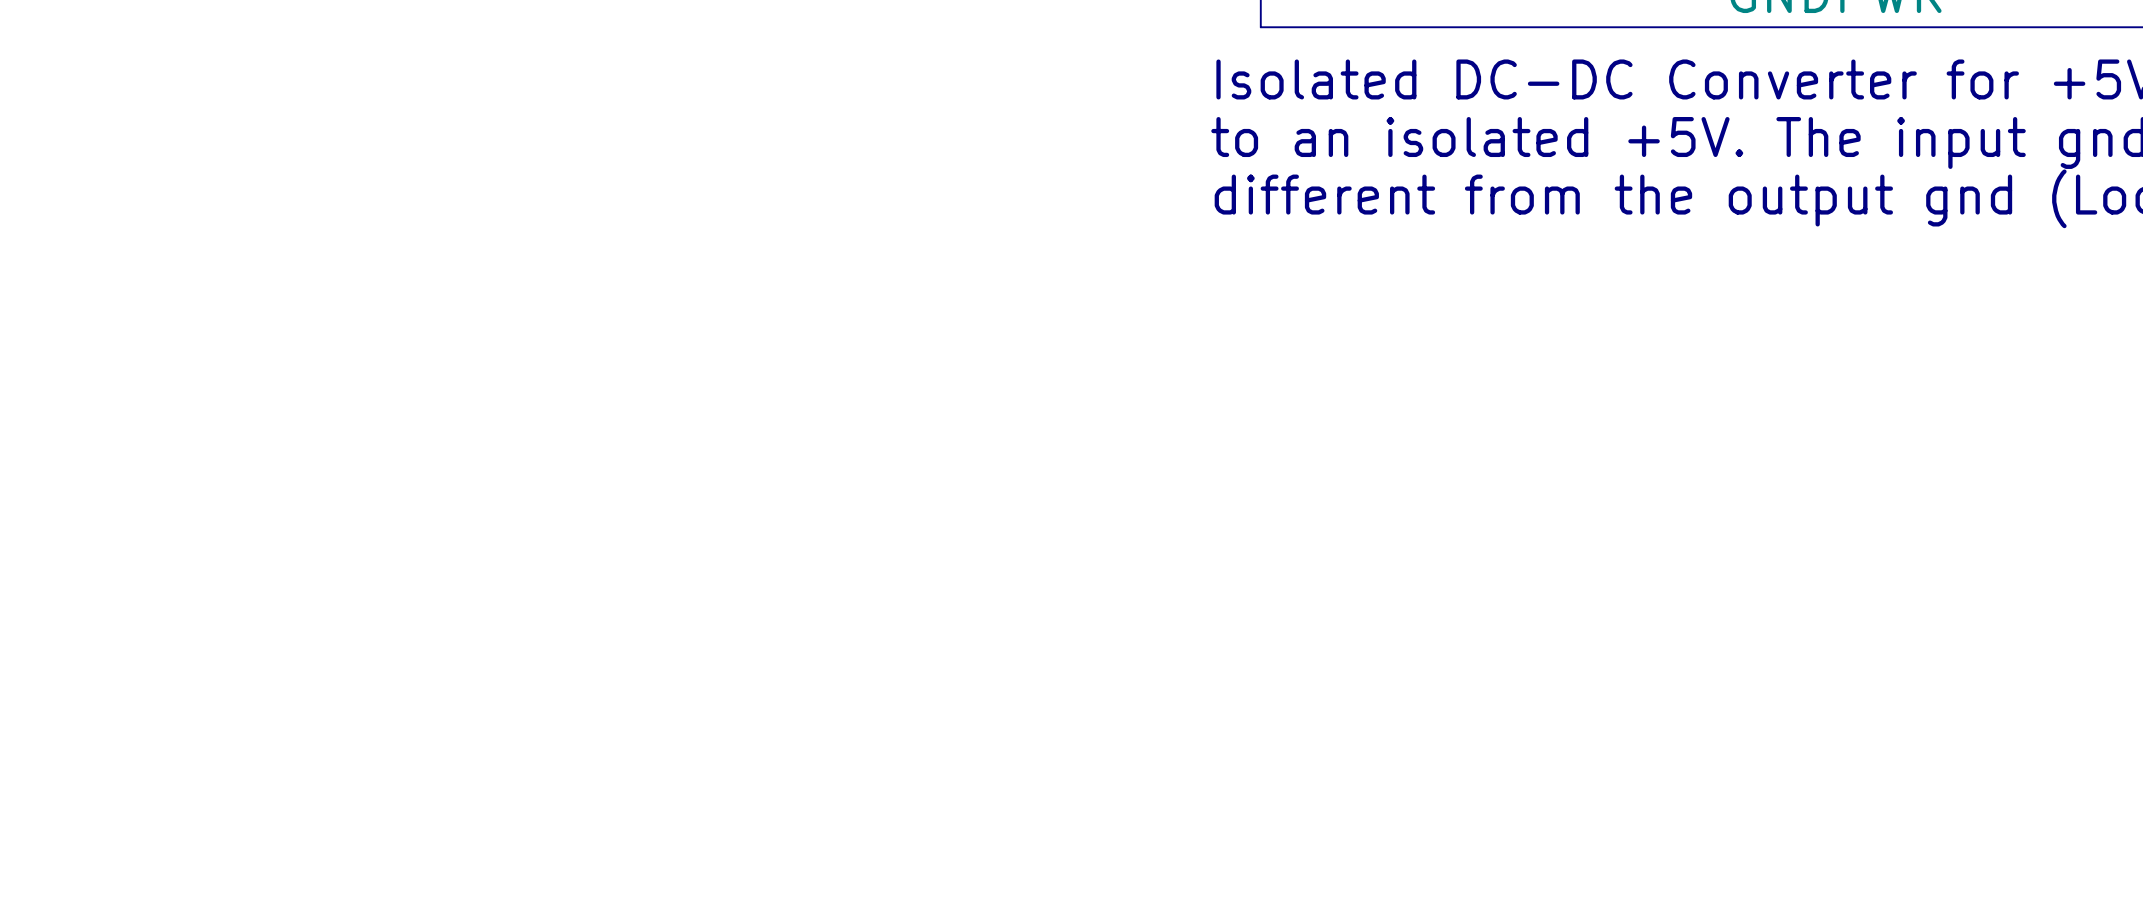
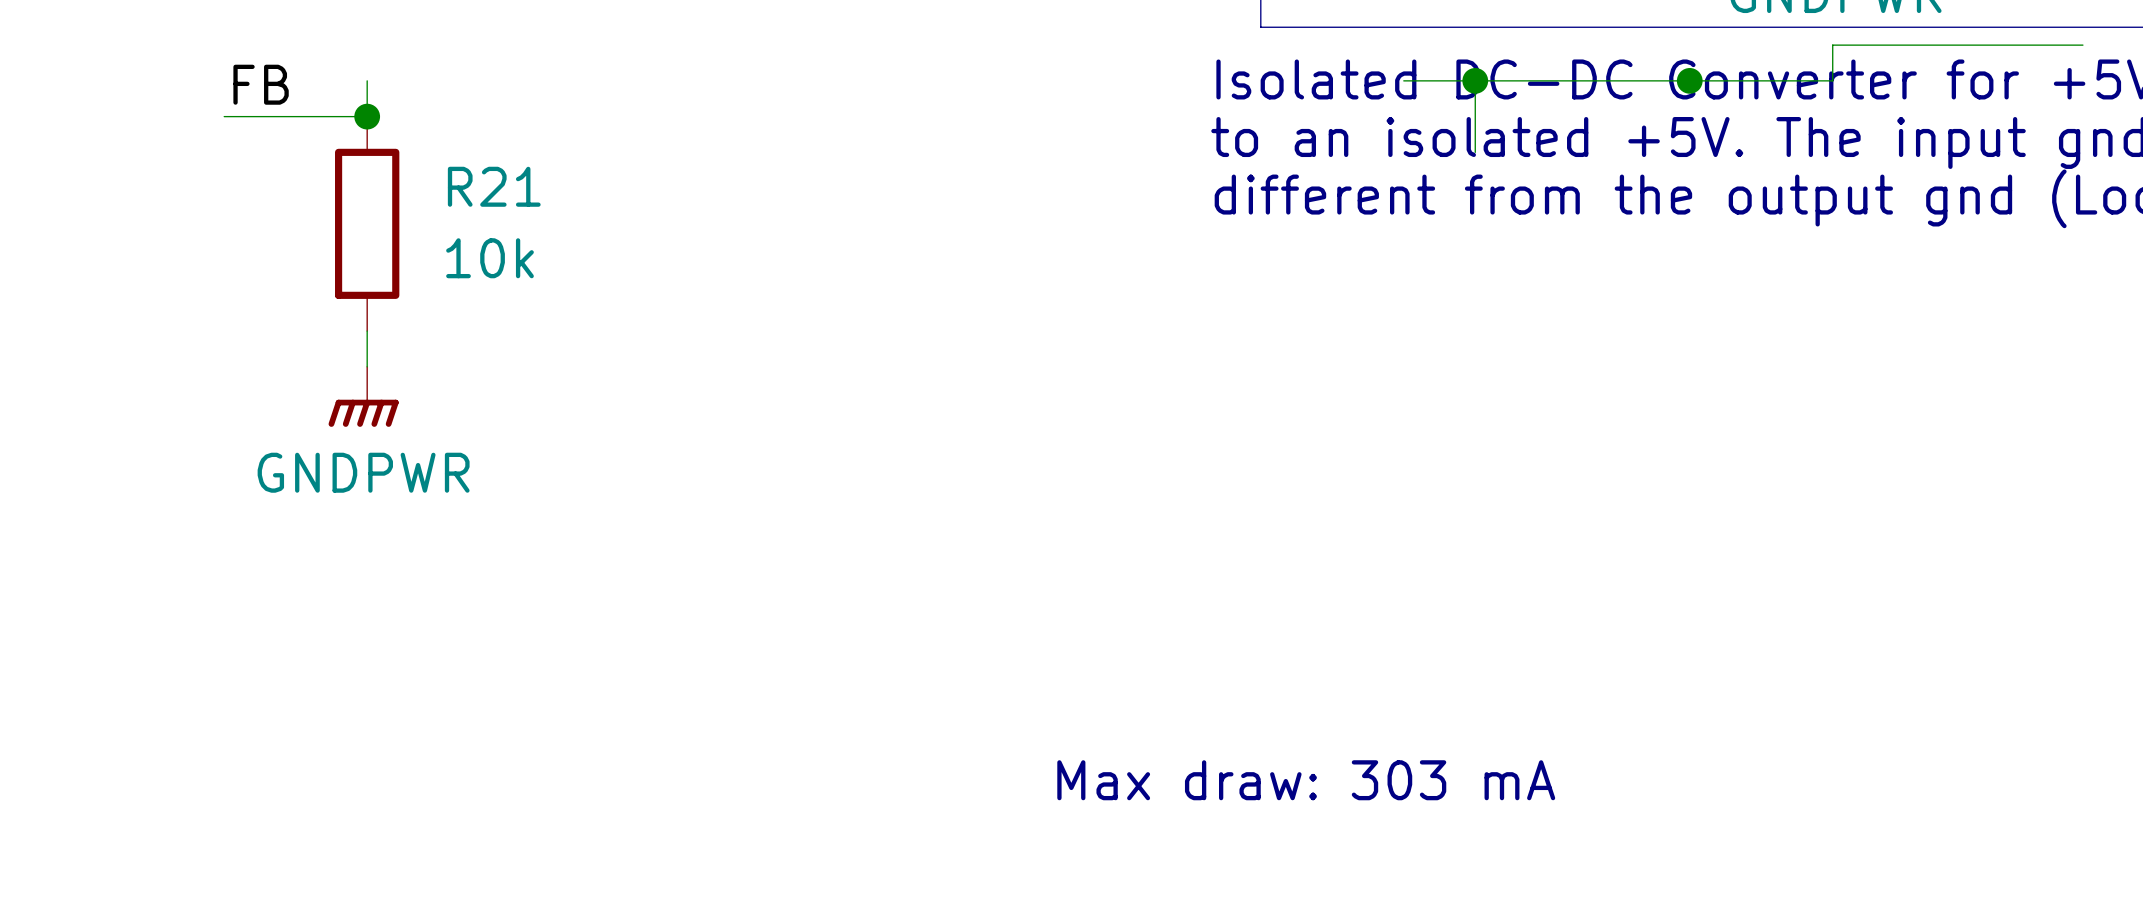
wire: none -> (2082, 45) (1832, 45) (1832, 80) (1403, 80)
wire: none -> (367, 80) (367, 116) (224, 116)
wire: none -> (1475, 80) (1475, 152)
junction: none -> (1475, 80)
junction: none -> (1689, 80)
label: none -> FB (261, 84)
junction: none -> (367, 116)
R21: none -> 10k (367, 223)
wire: none -> (367, 331) (367, 366)
power symbol: none -> GNDPWR (363, 396)
text: none -> Max draw: 303 mA (1306, 780)

